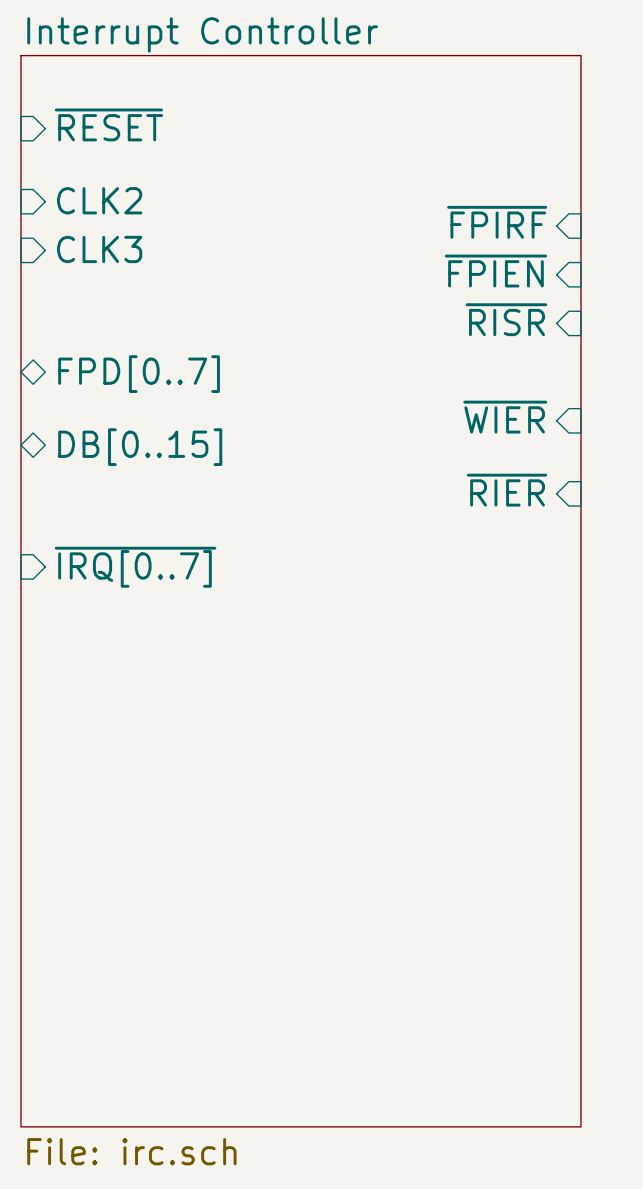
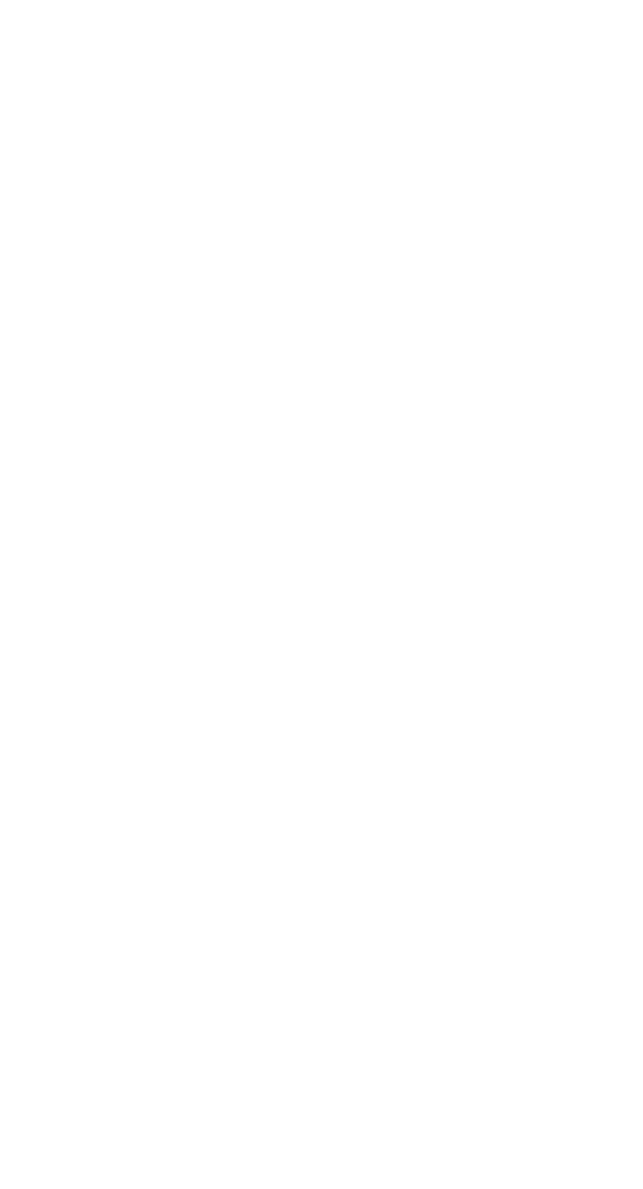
sheet pin: ~{RESET} (108, 124) -> none
sheet pin: CLK2 (99, 200) -> none
sheet pin: ~{FPIRF} (497, 222) -> none
sheet pin: CLK3 (99, 249) -> none
sheet pin: ~{FPIEN} (495, 271) -> none
sheet pin: ~{RISR} (506, 319) -> none
sheet pin: FPD[0..7] (139, 374) -> none
sheet pin: ~{WIER} (505, 417) -> none
sheet pin: DB[0..15] (140, 447) -> none
sheet pin: ~{RIER} (506, 490) -> none
sheet pin: ~{IRQ[0..7]} (135, 567) -> none
sheet Interrupt Controller: File: irc.sch (300, 591) -> none

